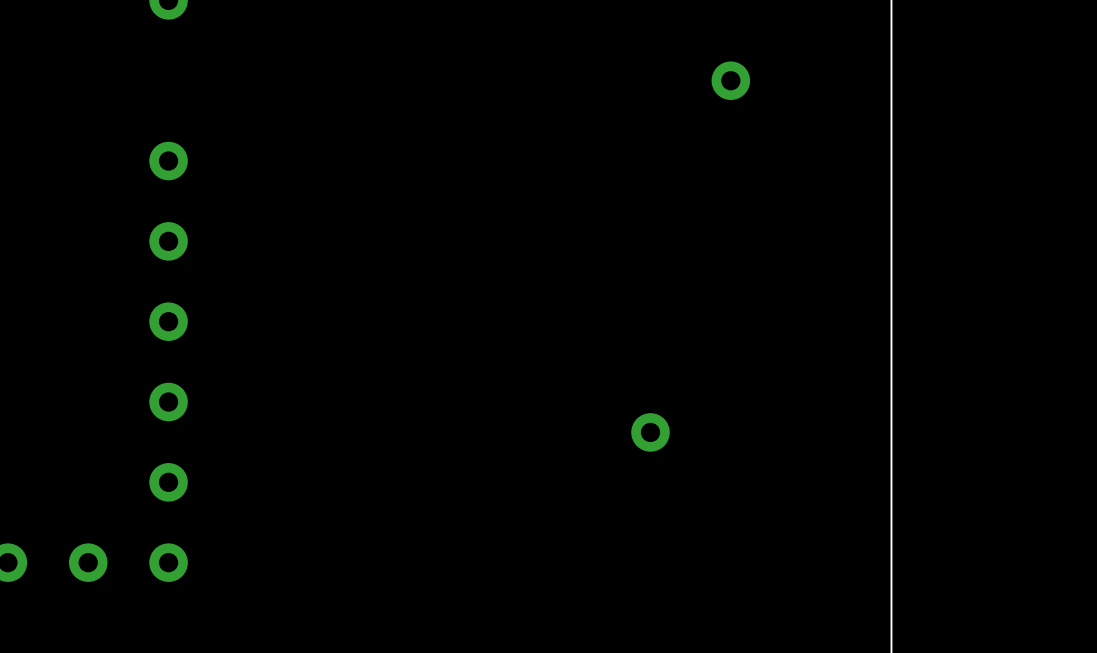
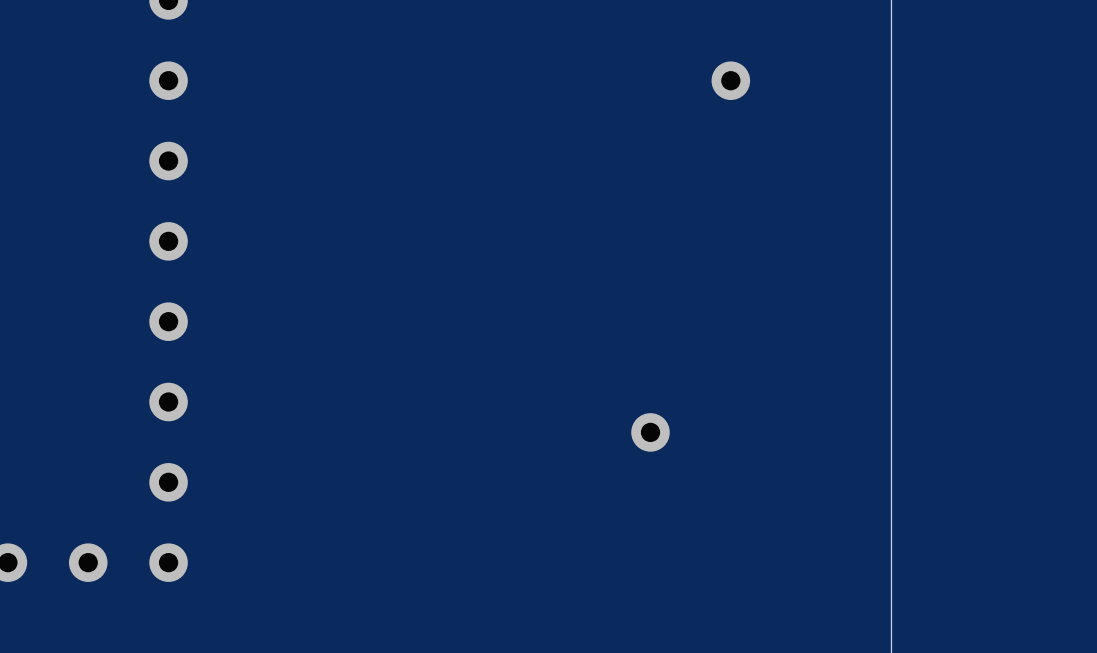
via: none -> (168, 80)

